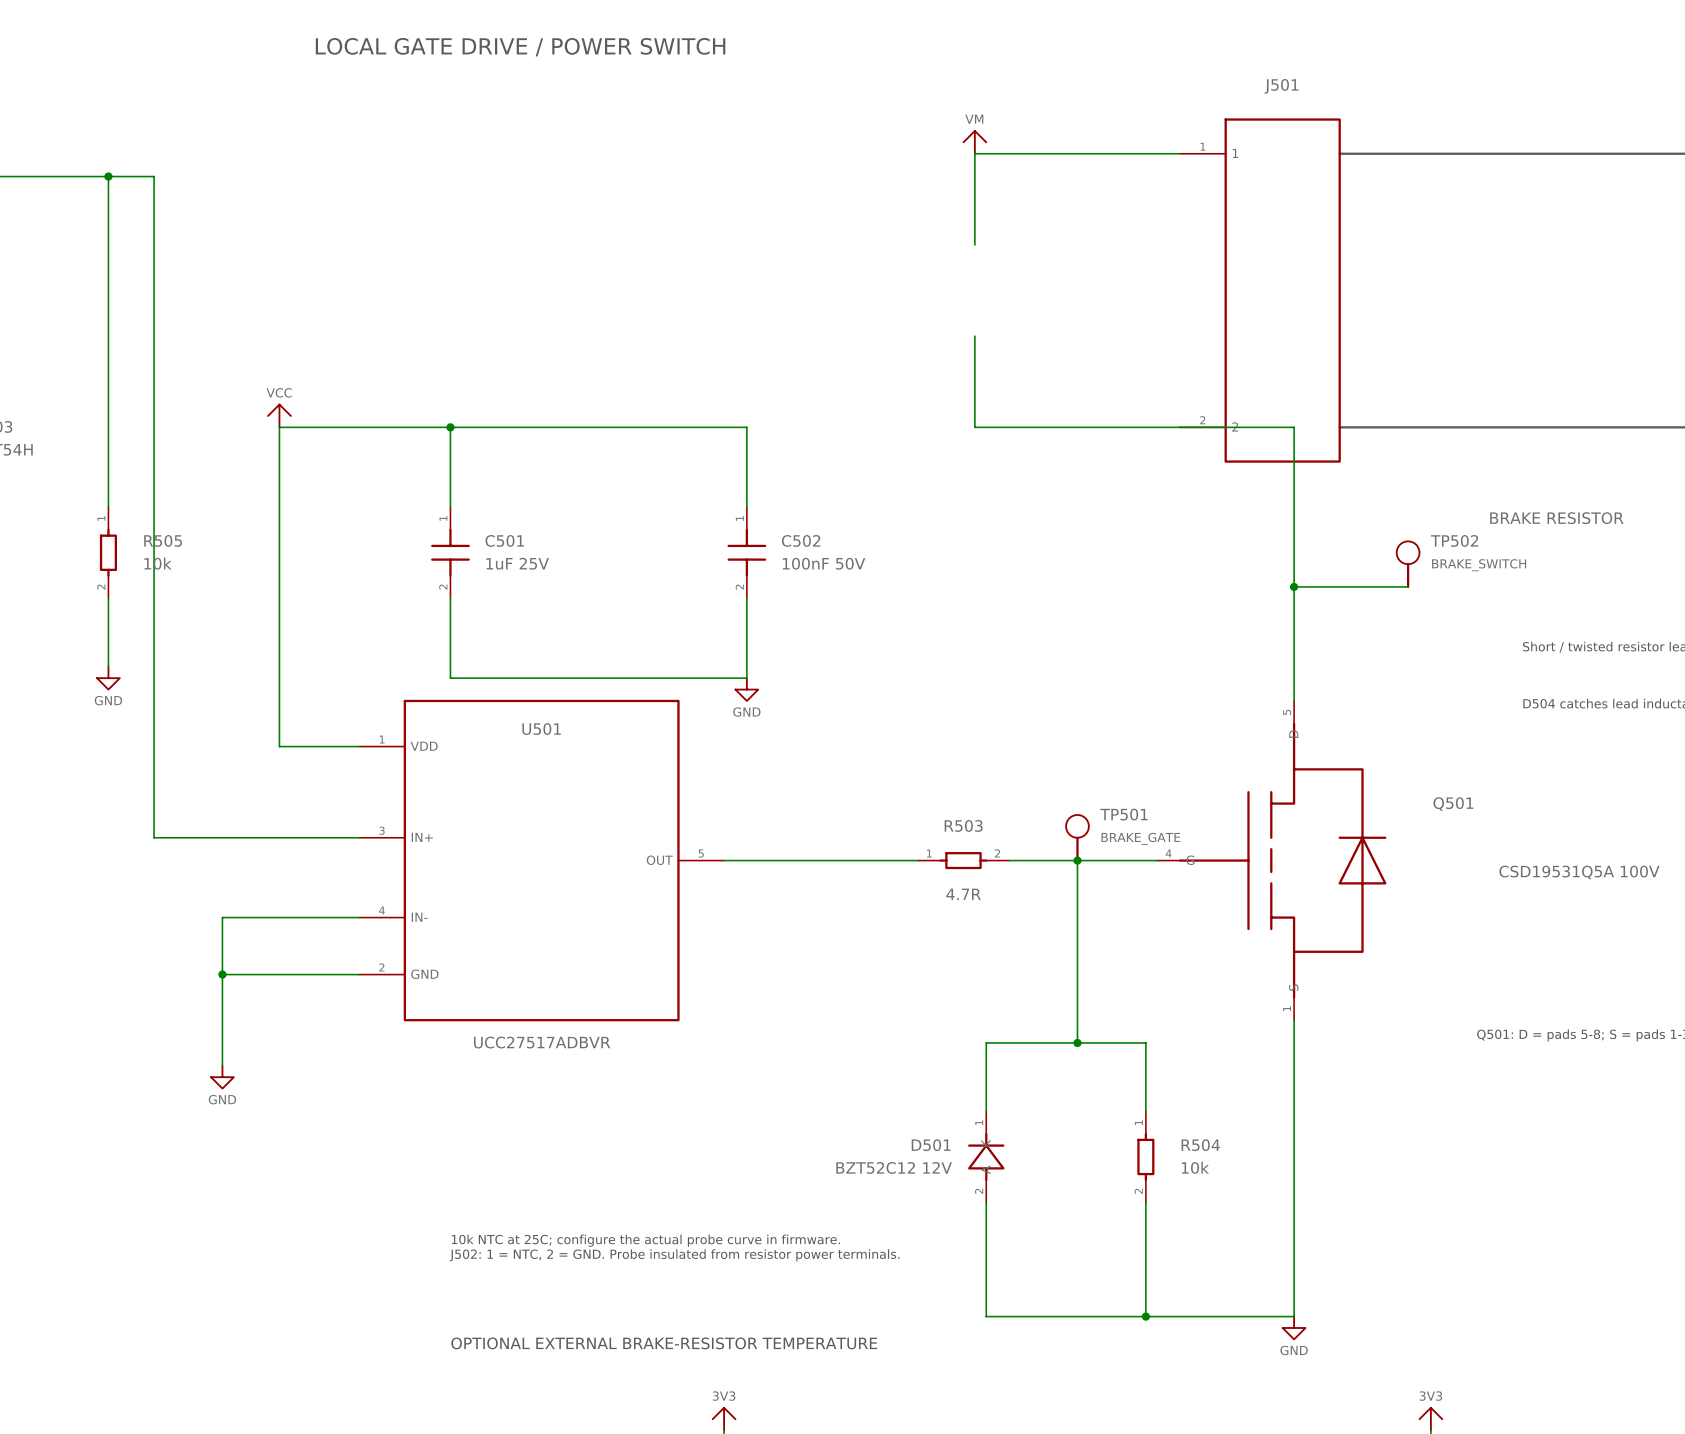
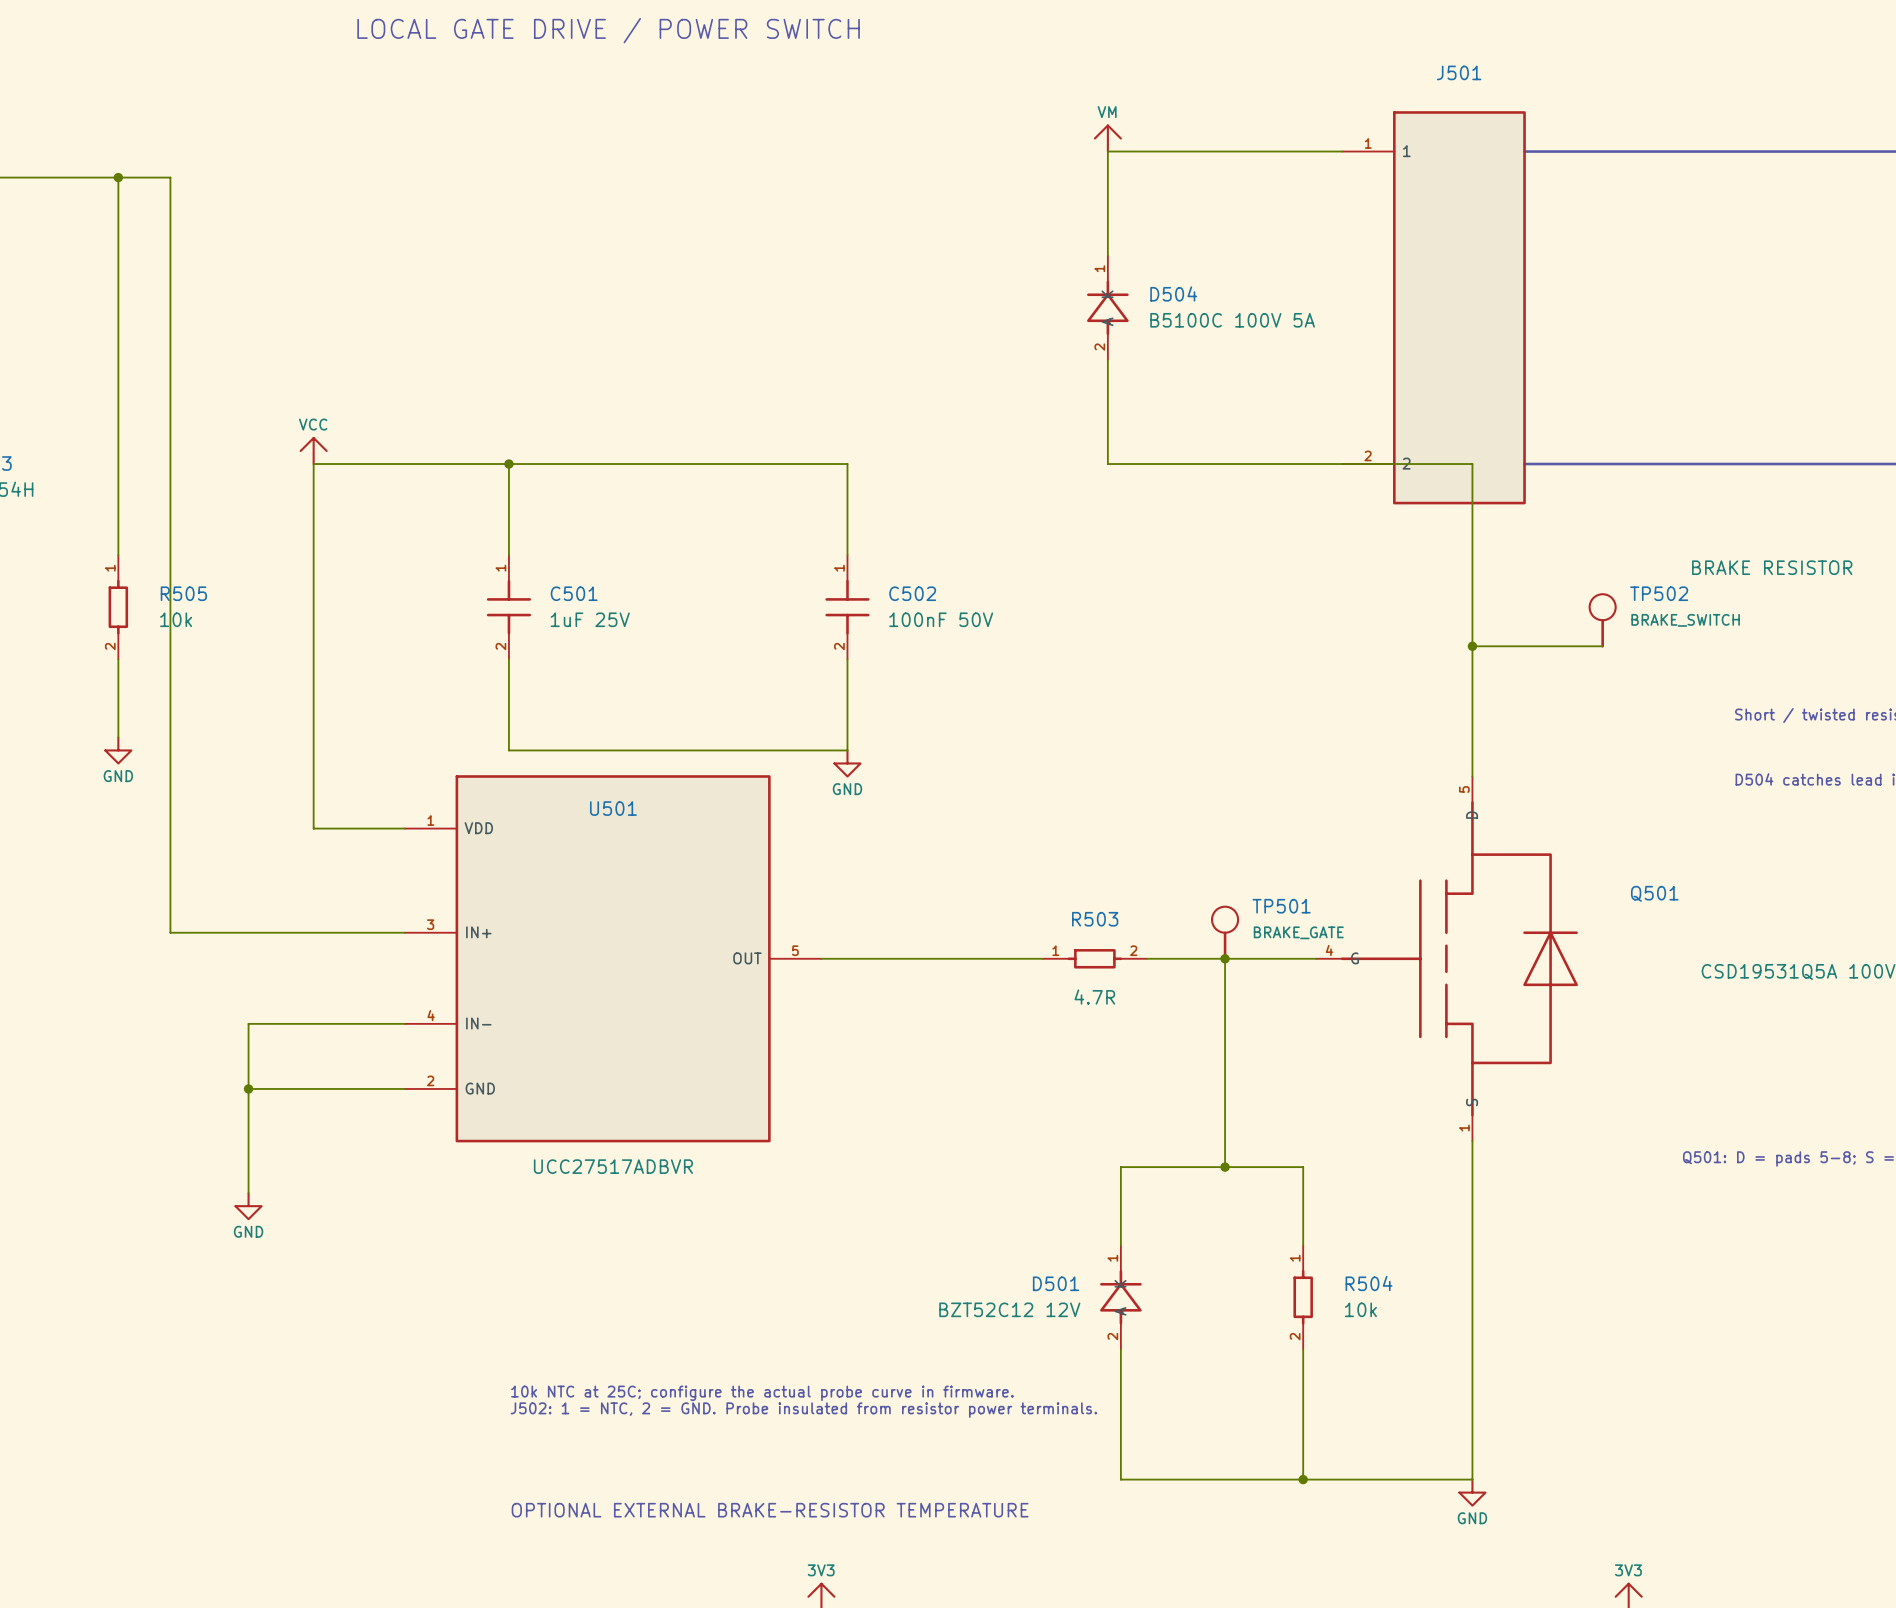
D504: none -> B5100C 100V 5A (1107, 307)

